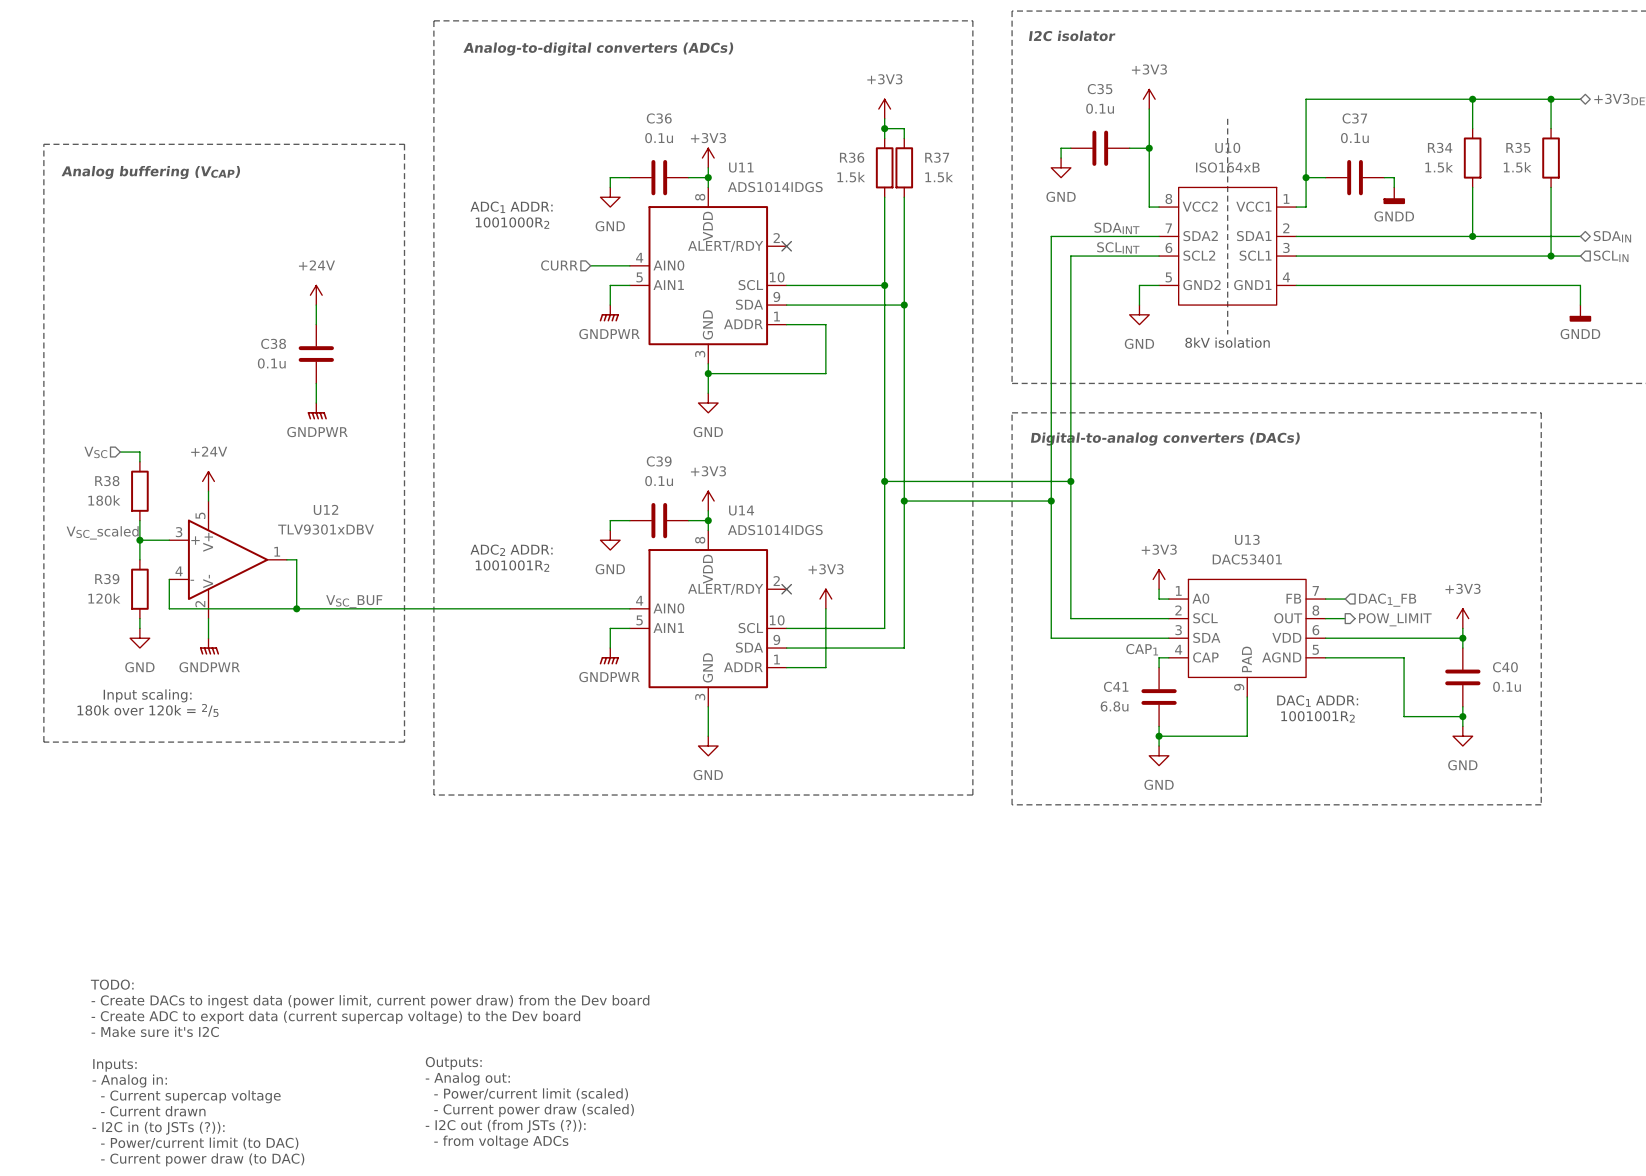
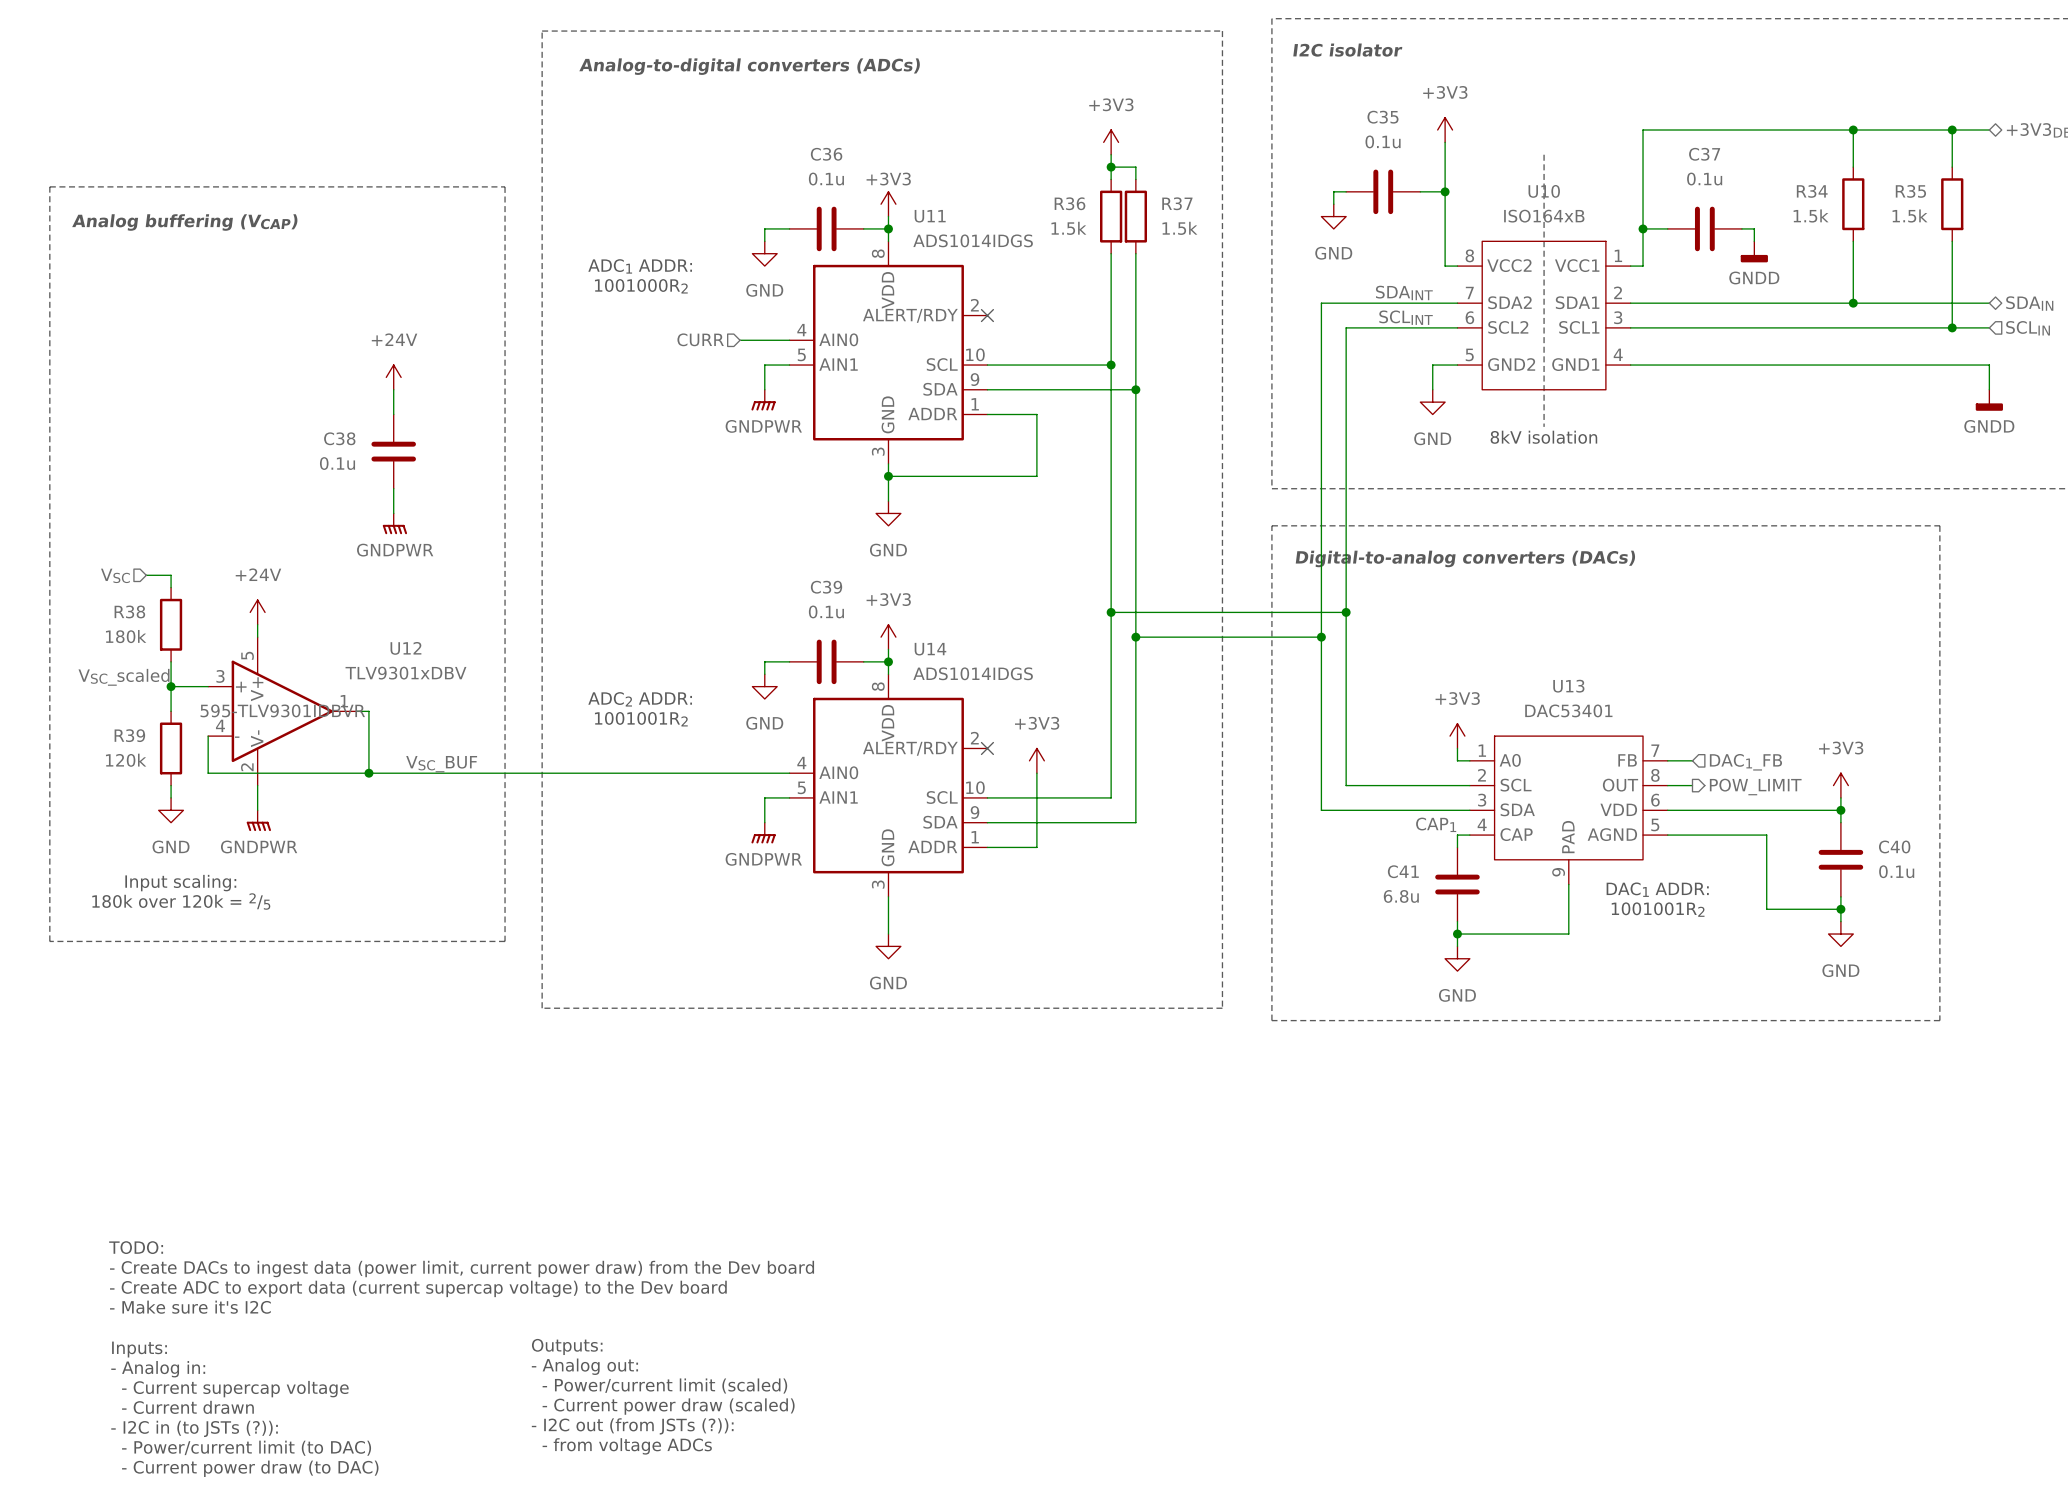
U12 text: none -> 595-TLV9301IDBVR (282, 710)

